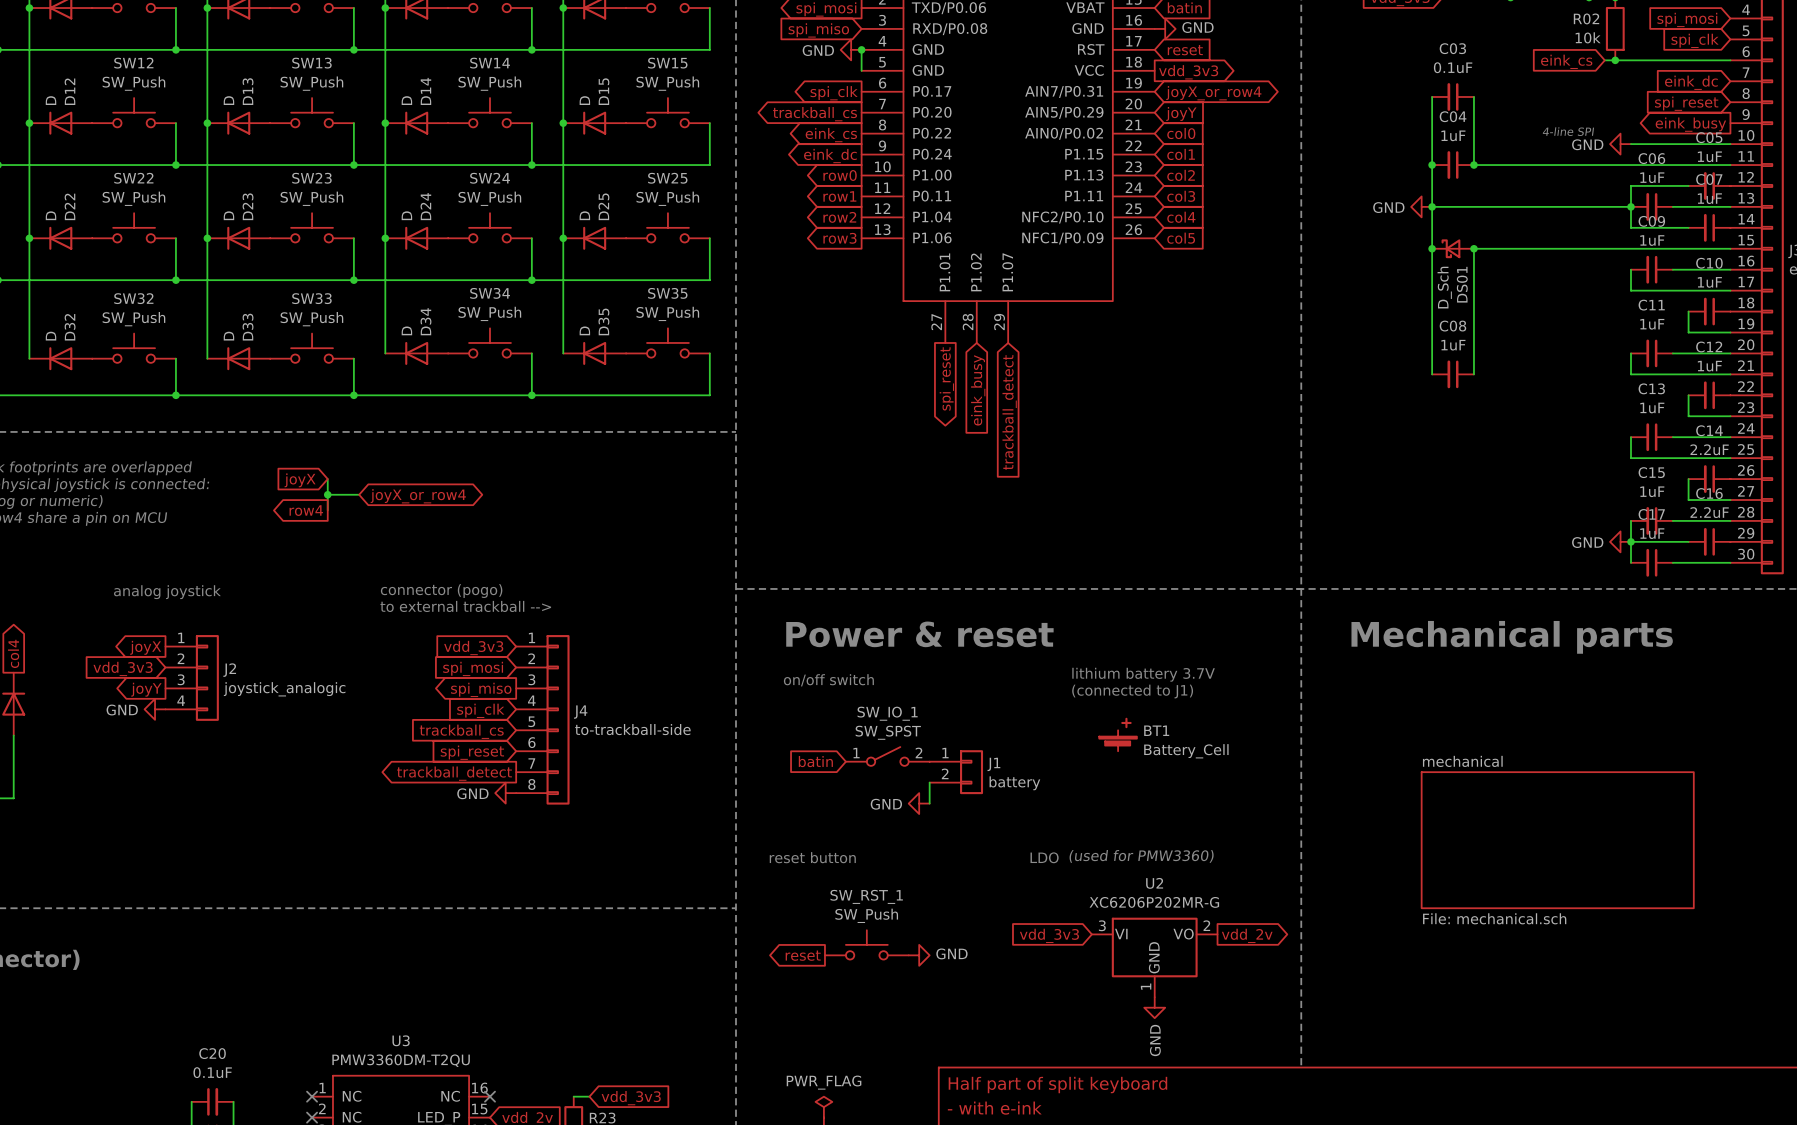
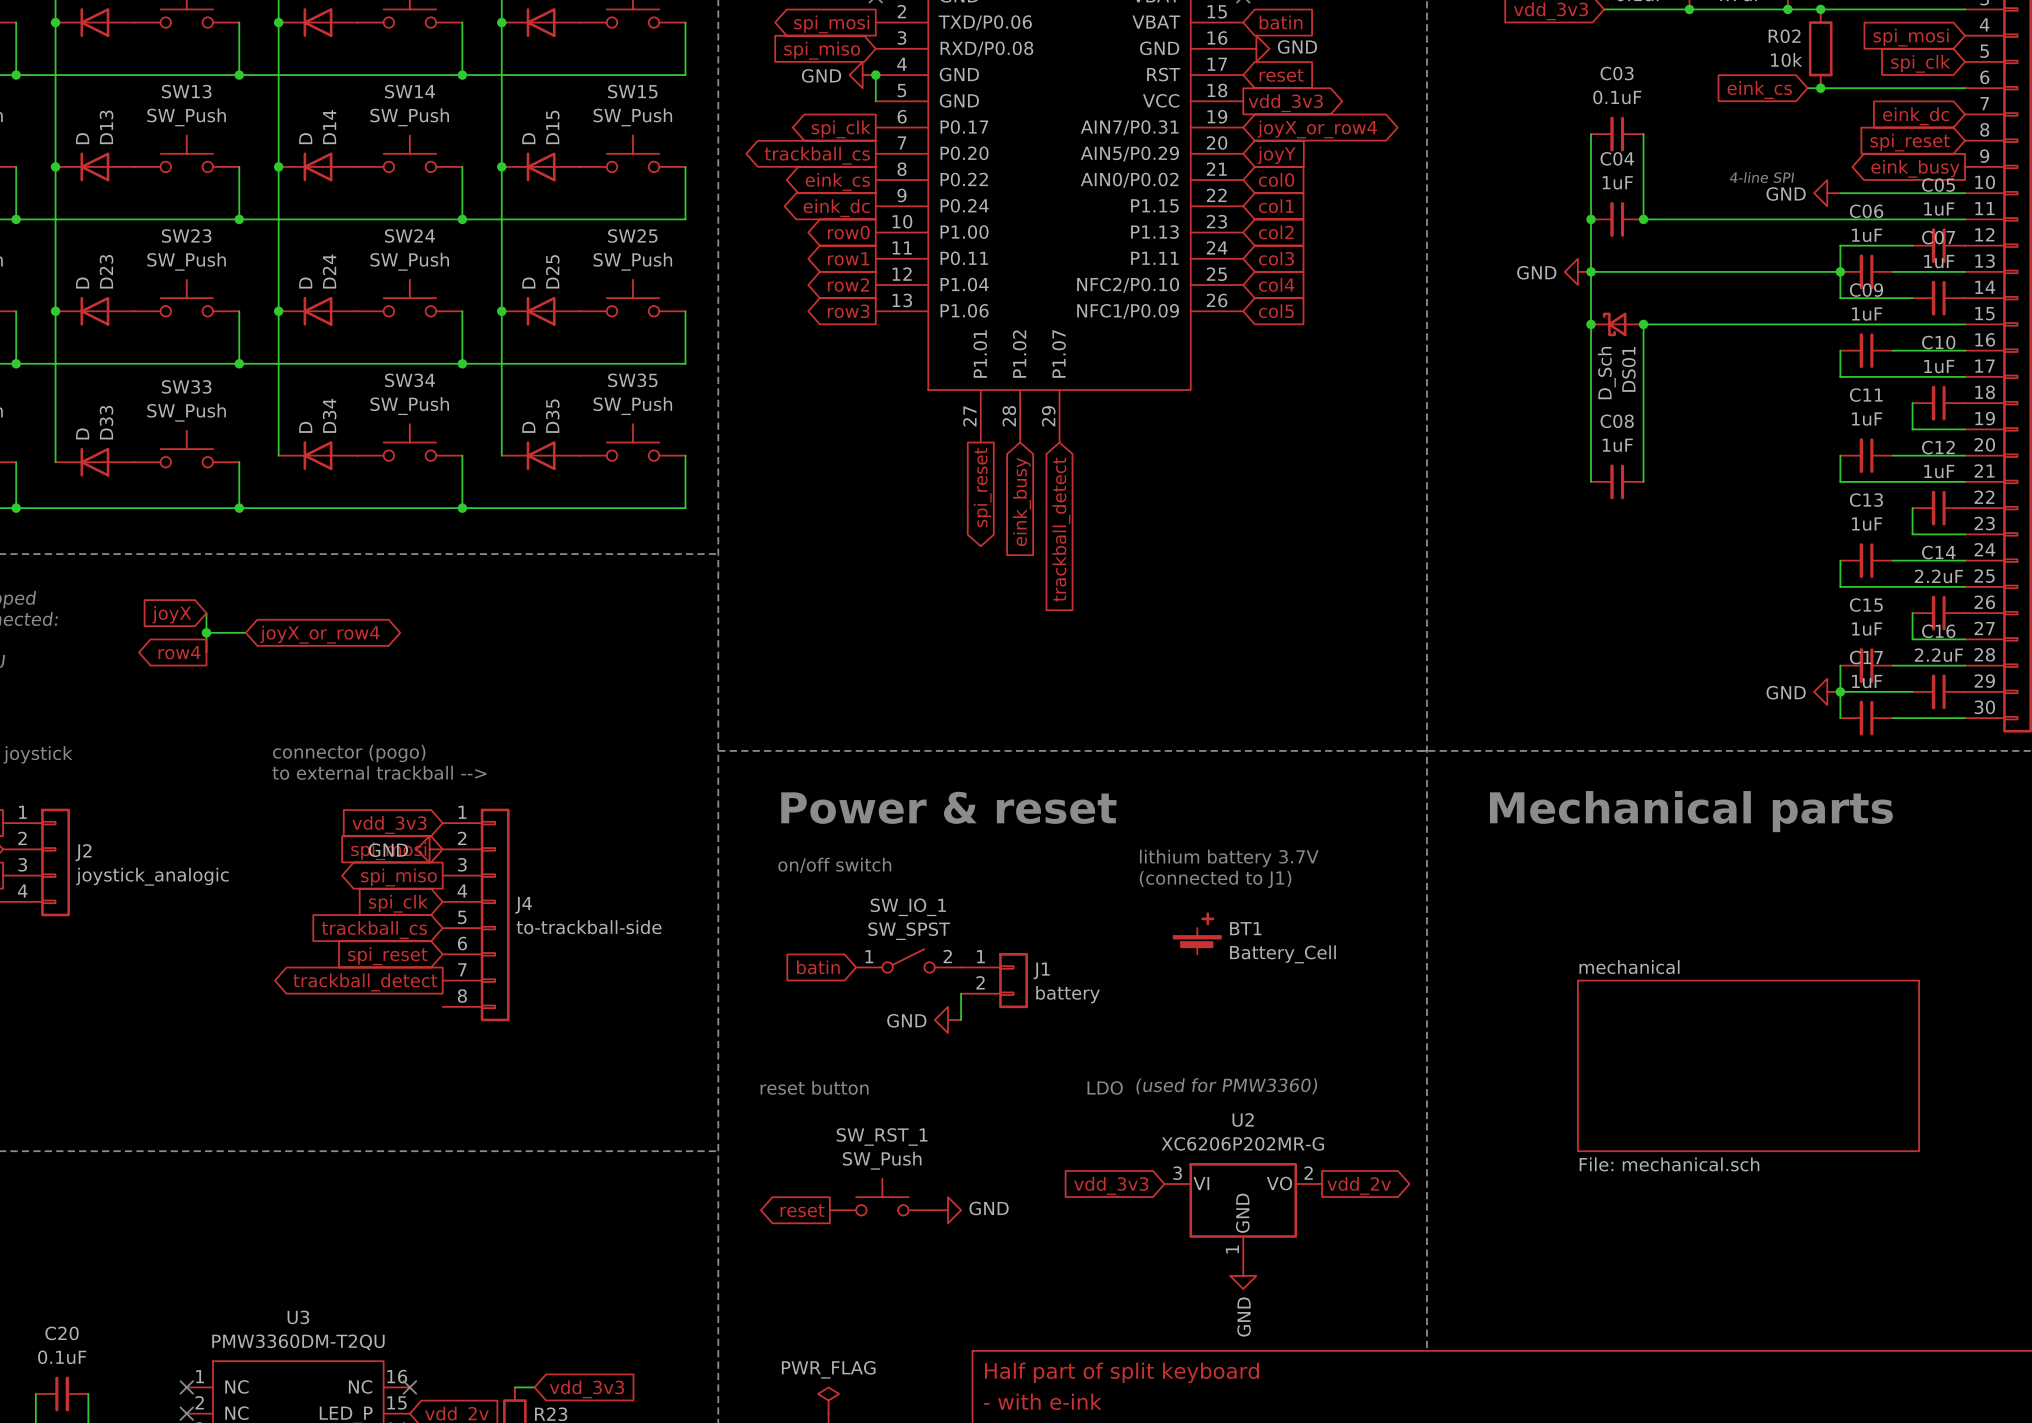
power symbol position: GND (505, 793) -> GND (429, 849)

